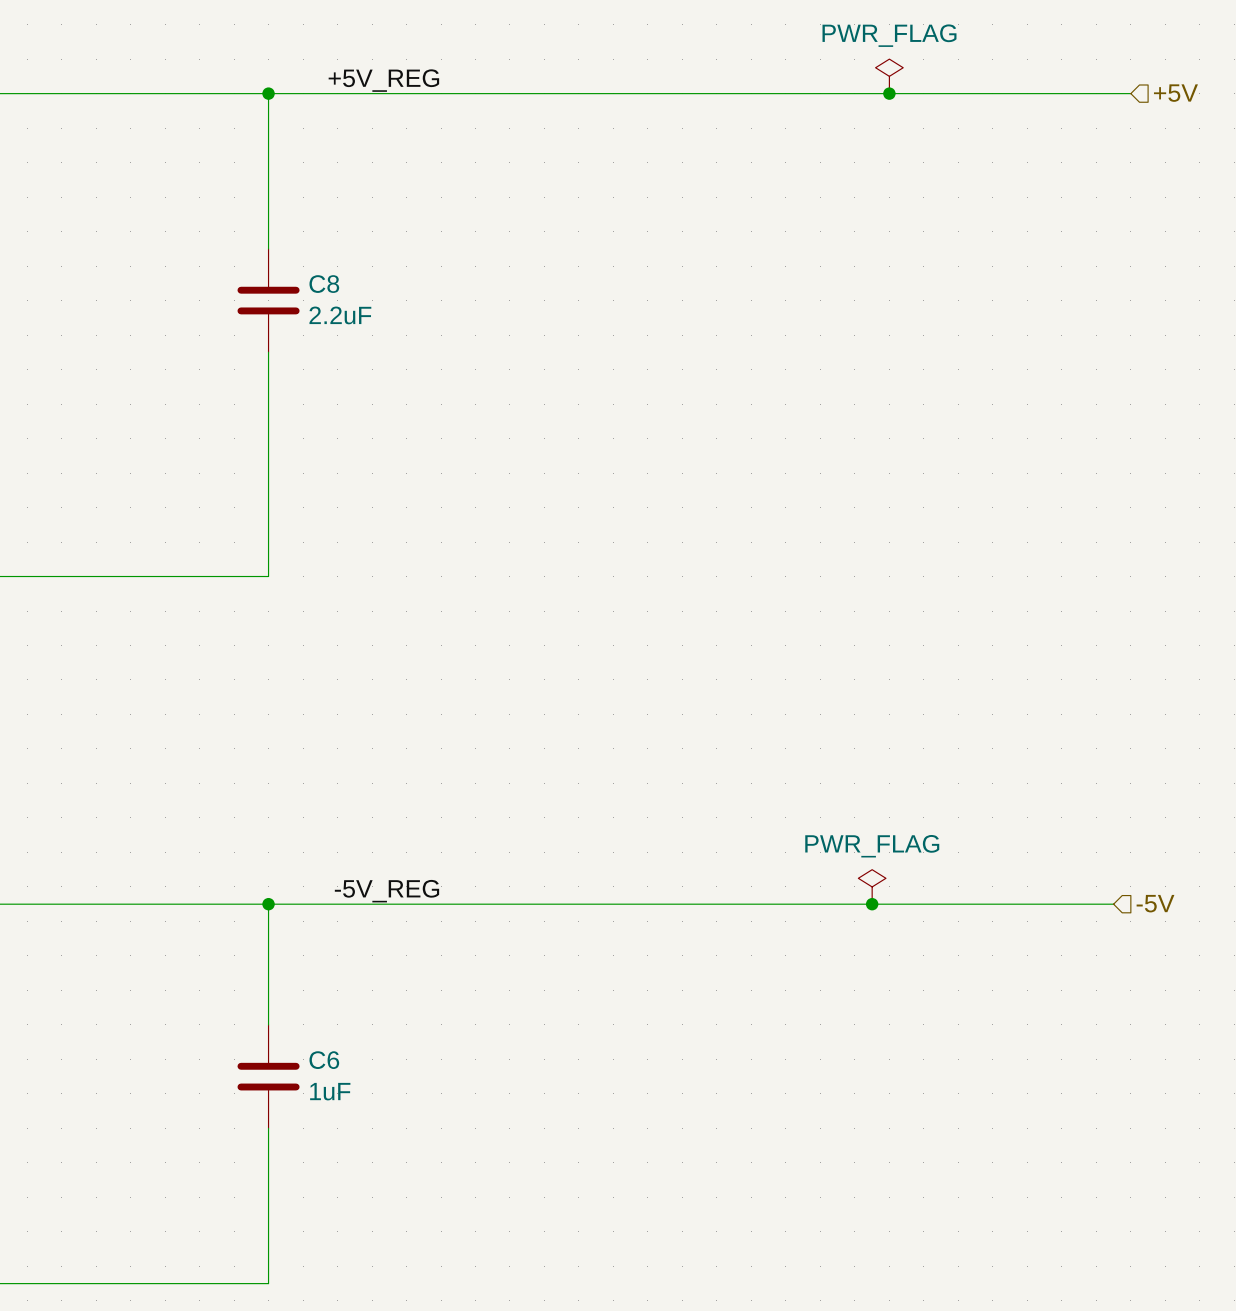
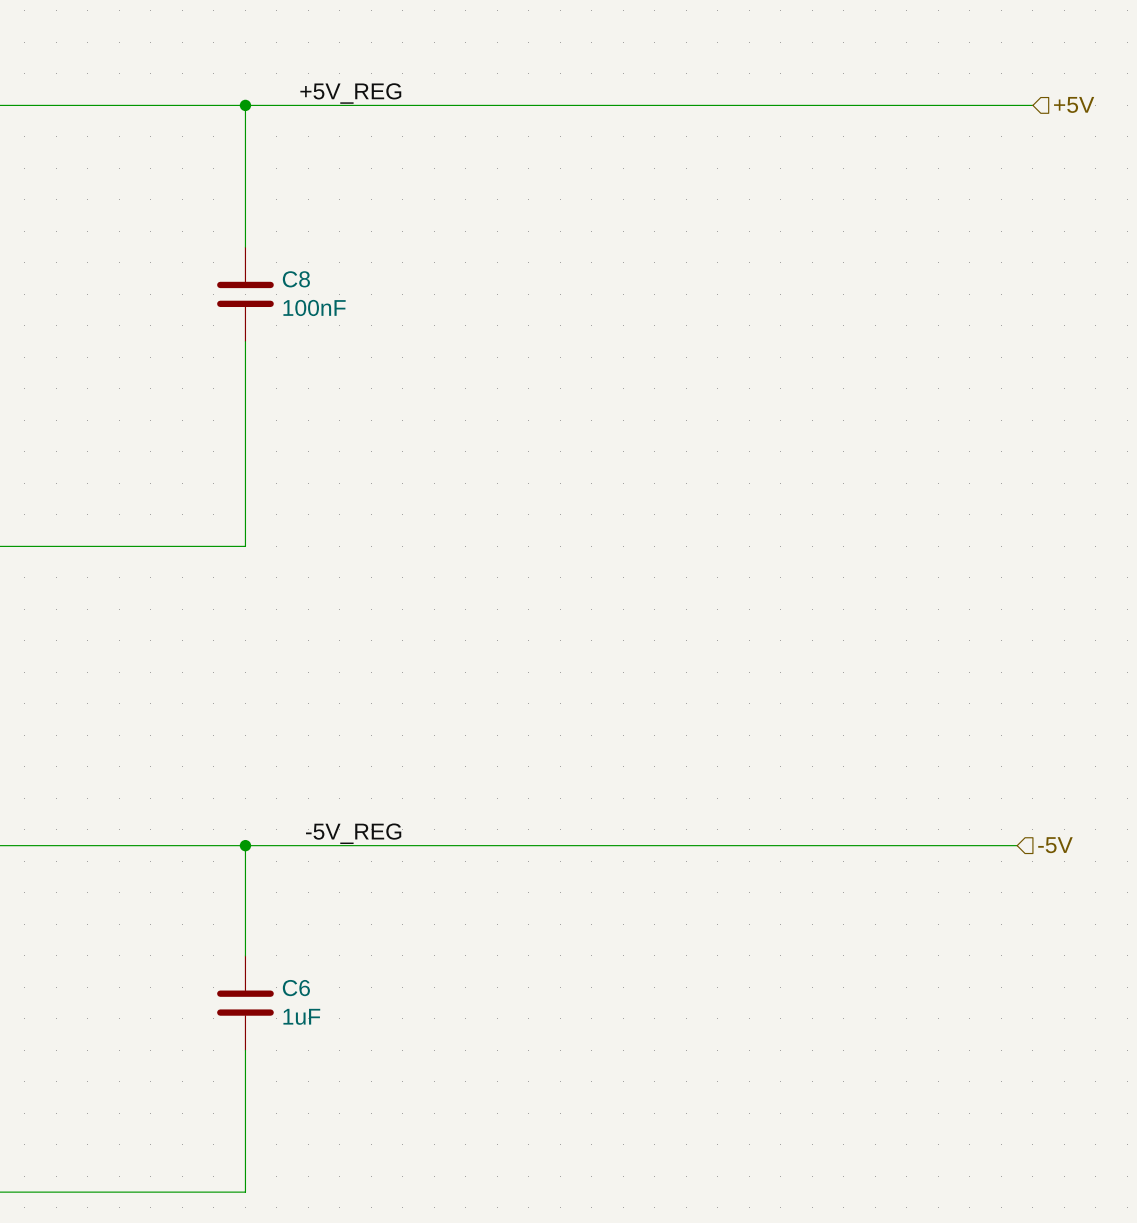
power symbol: PWR_FLAG (889, 76) -> none
junction: (889, 93) -> none
C8 value: 2.2uF (340, 315) -> 100nF (314, 307)
power symbol: PWR_FLAG (872, 886) -> none
junction: (872, 904) -> none

